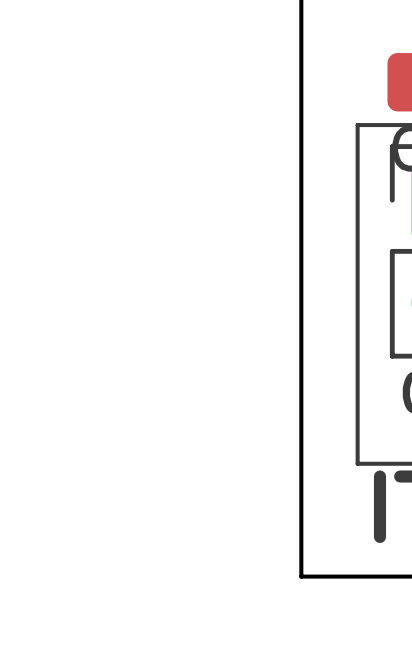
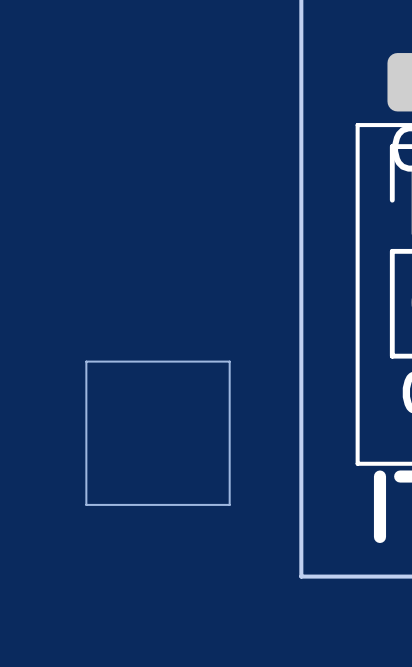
line: none -> (86, 361) (229, 361) (229, 504) (86, 504) (86, 361)

